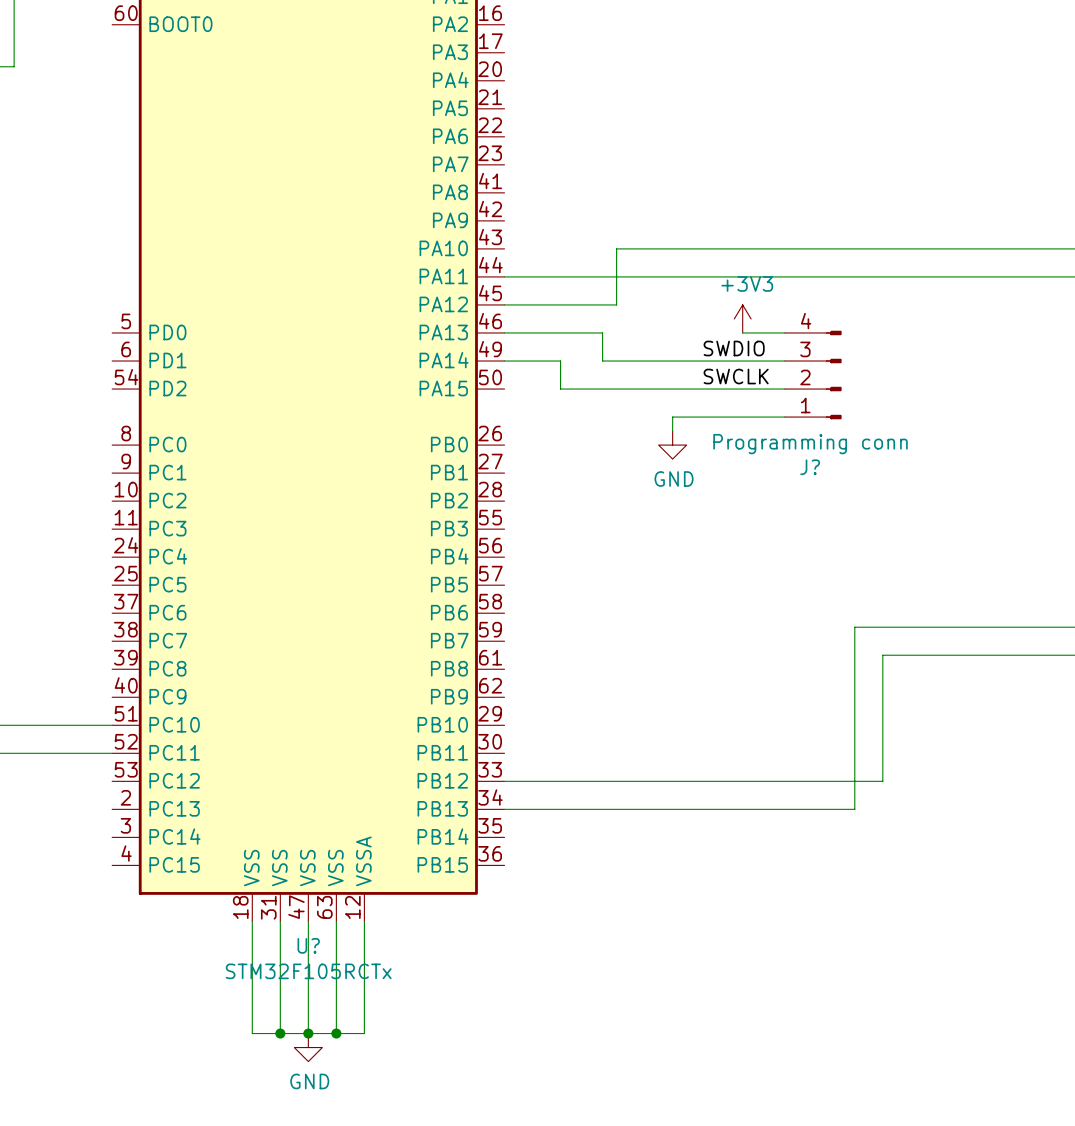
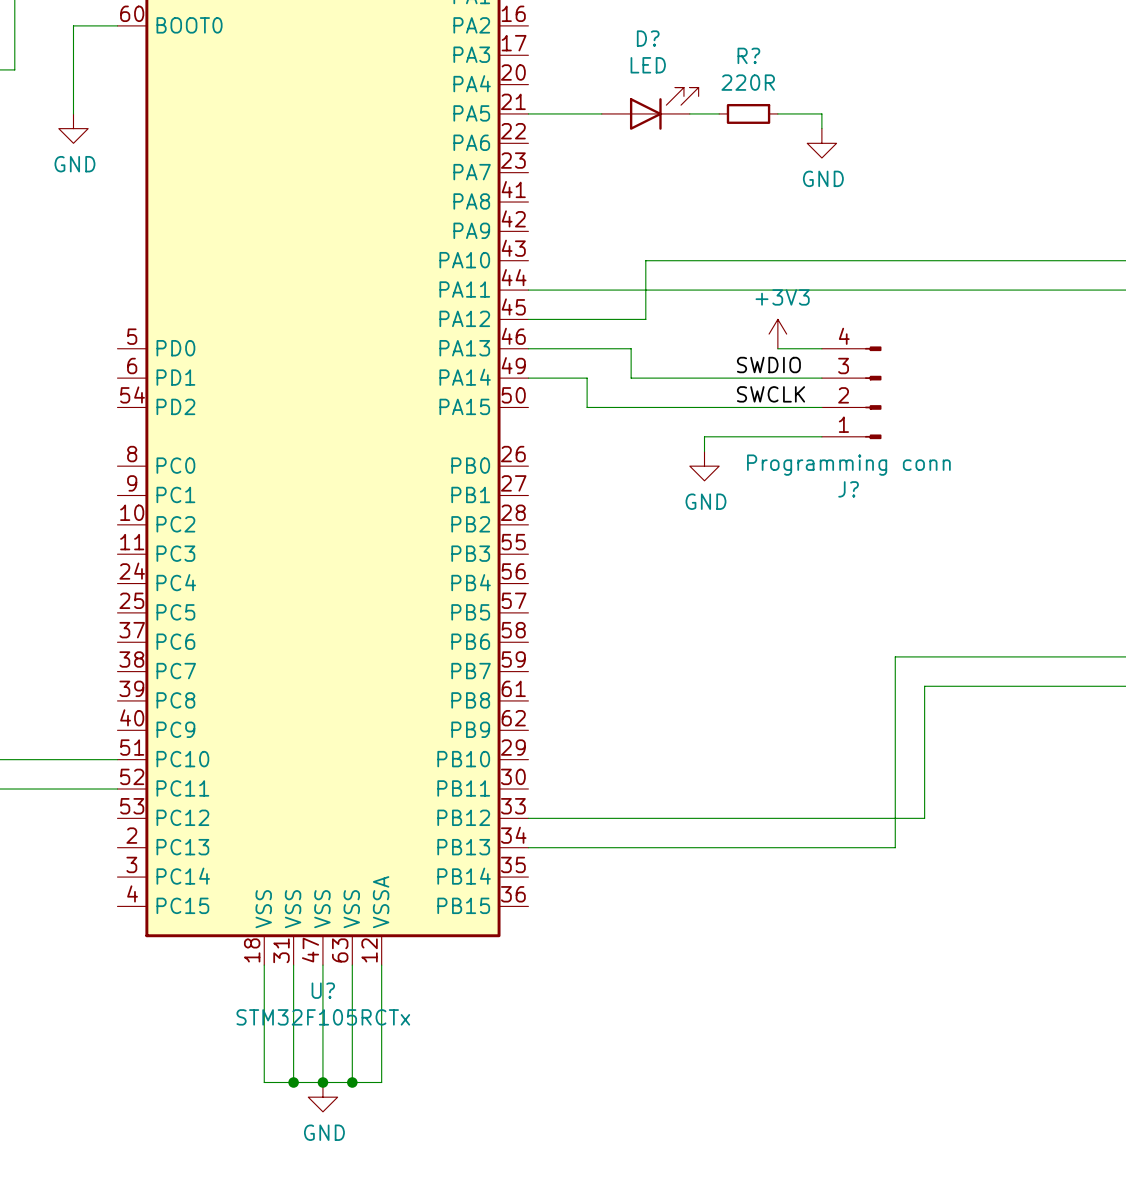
wire: none -> (117, 25) (73, 25) (73, 113)
D?: none -> LED (650, 108)
wire: none -> (528, 113) (601, 113)
wire: none -> (689, 113) (719, 113)
R?: none -> 220R (748, 113)
wire: none -> (777, 113) (821, 113) (821, 128)
power symbol: none -> GND (73, 128)
power symbol: none -> GND (821, 143)

